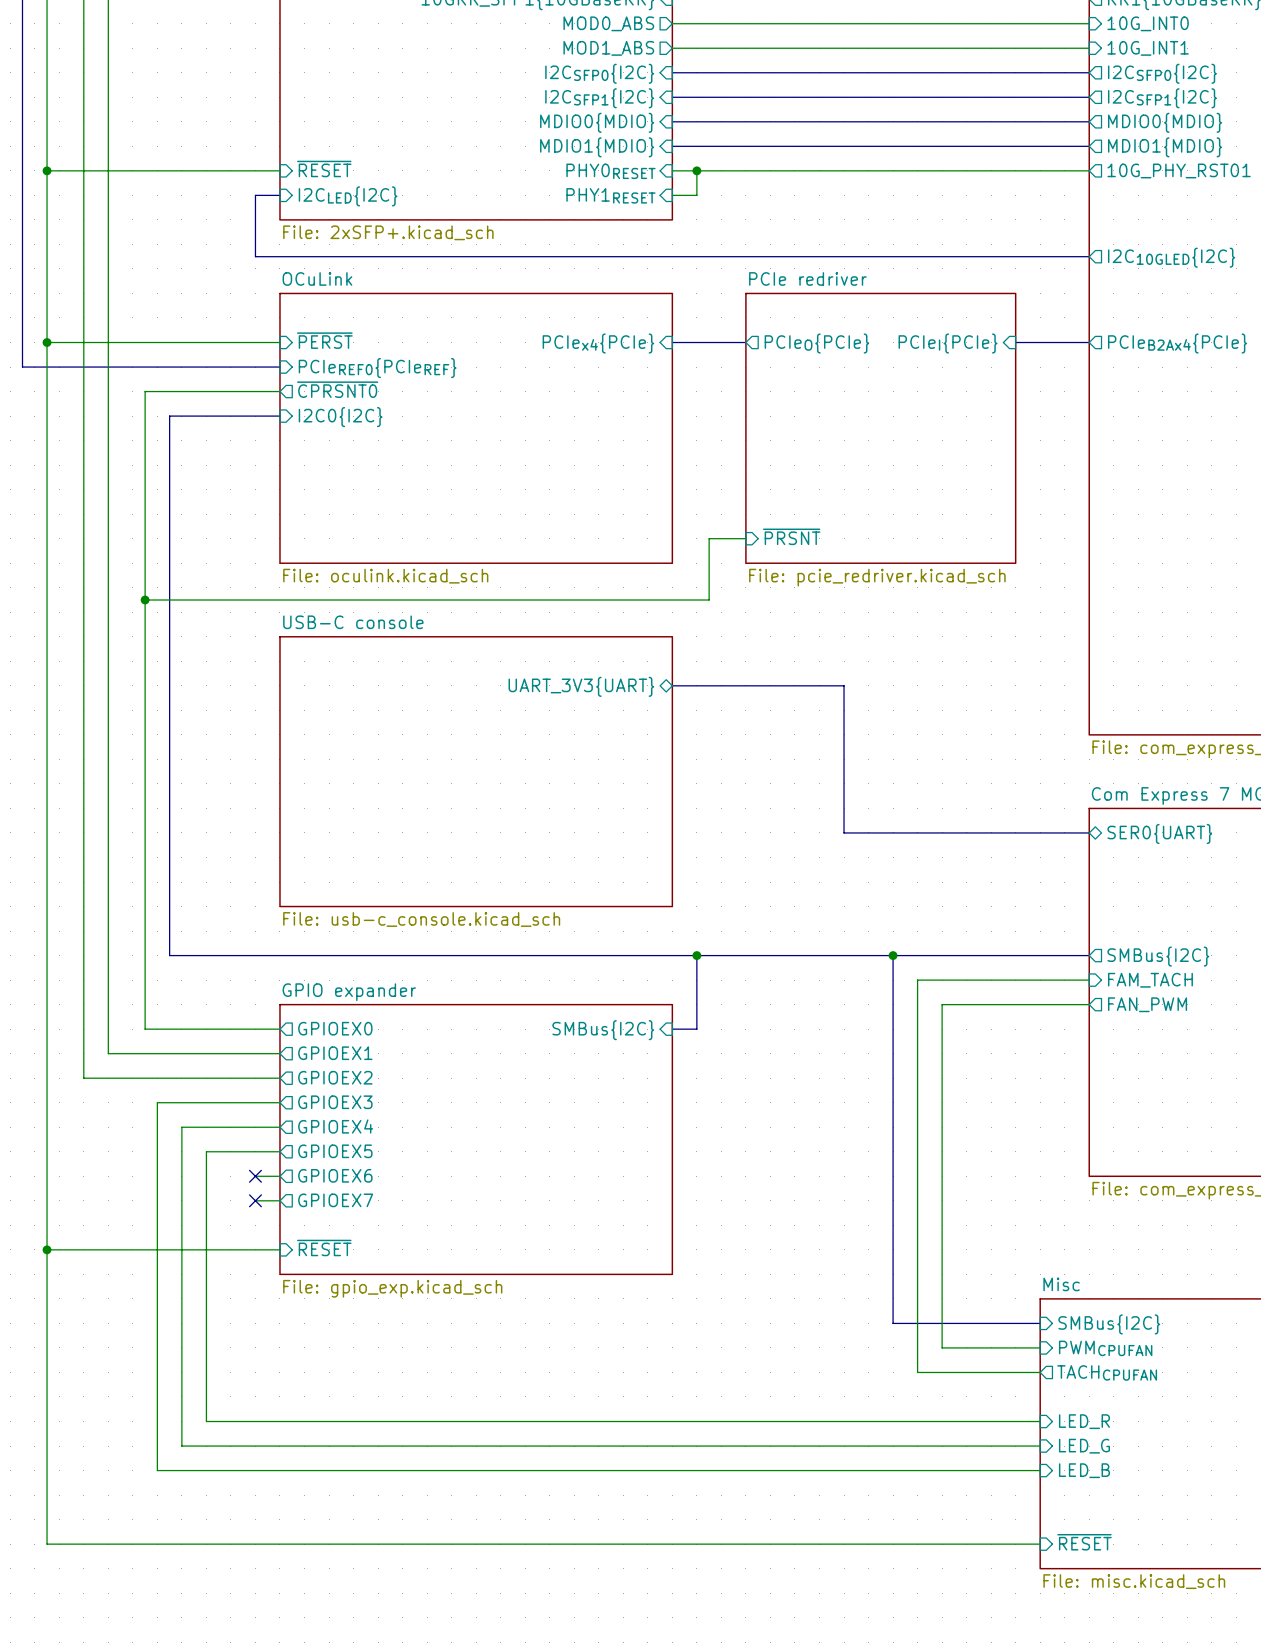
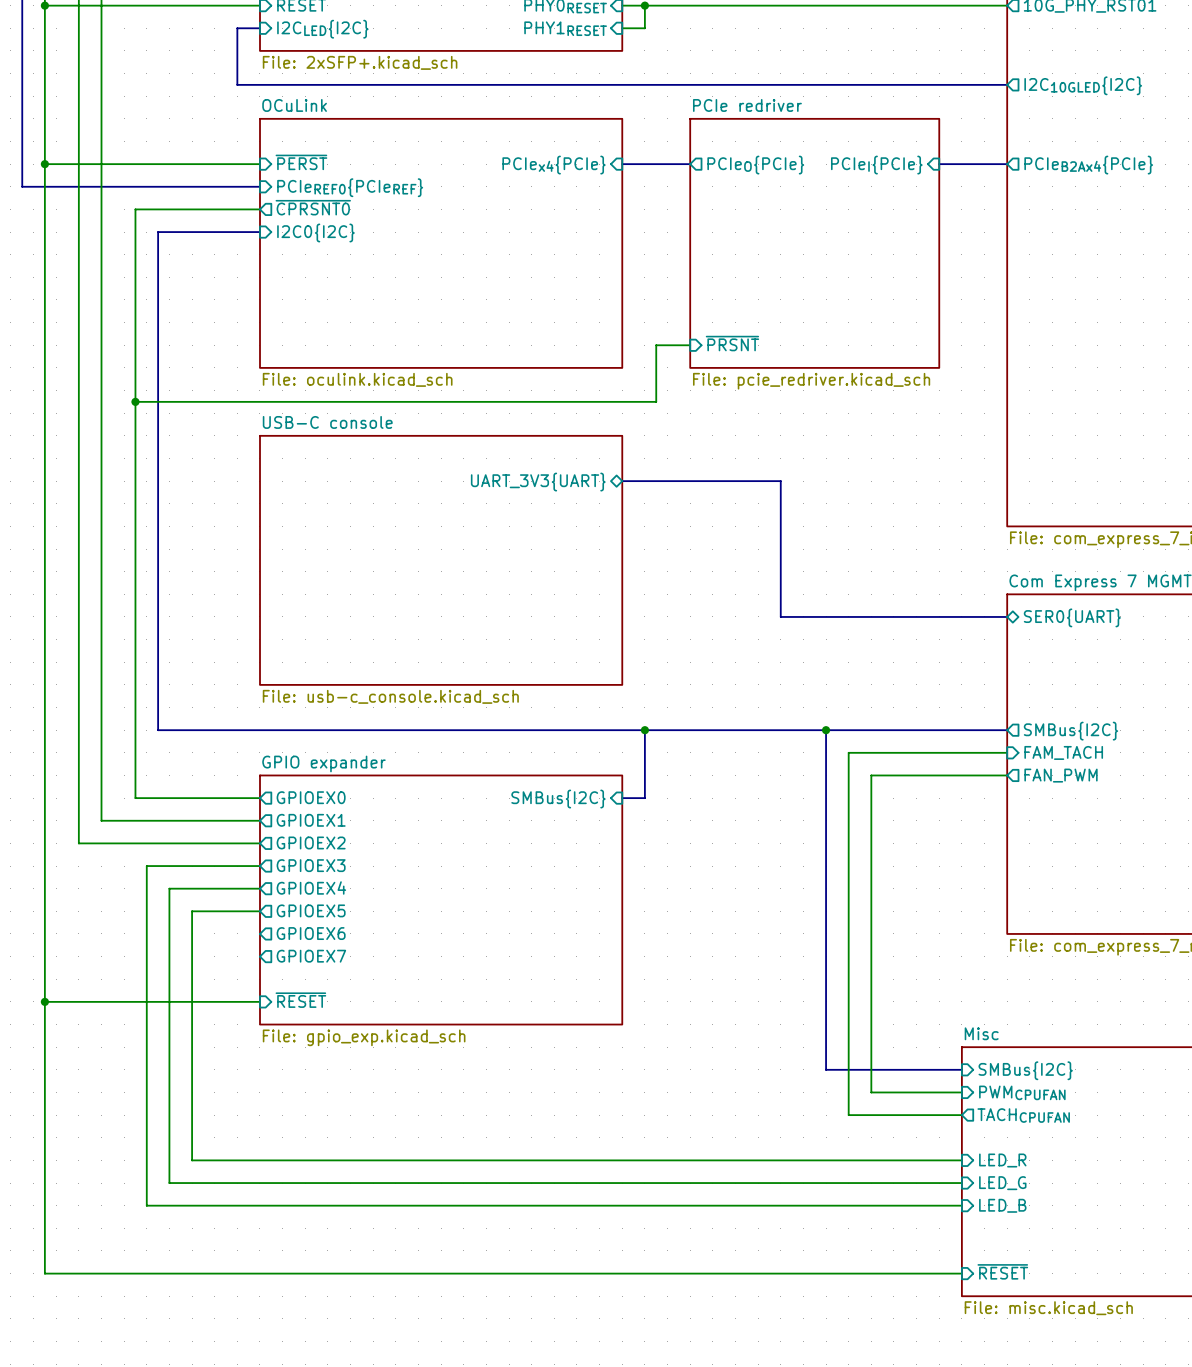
wire: (255, 1176) (279, 1176) -> none
no-connect mark: (255, 1176) -> none
wire: (255, 1200) (279, 1200) -> none
no-connect mark: (255, 1200) -> none

